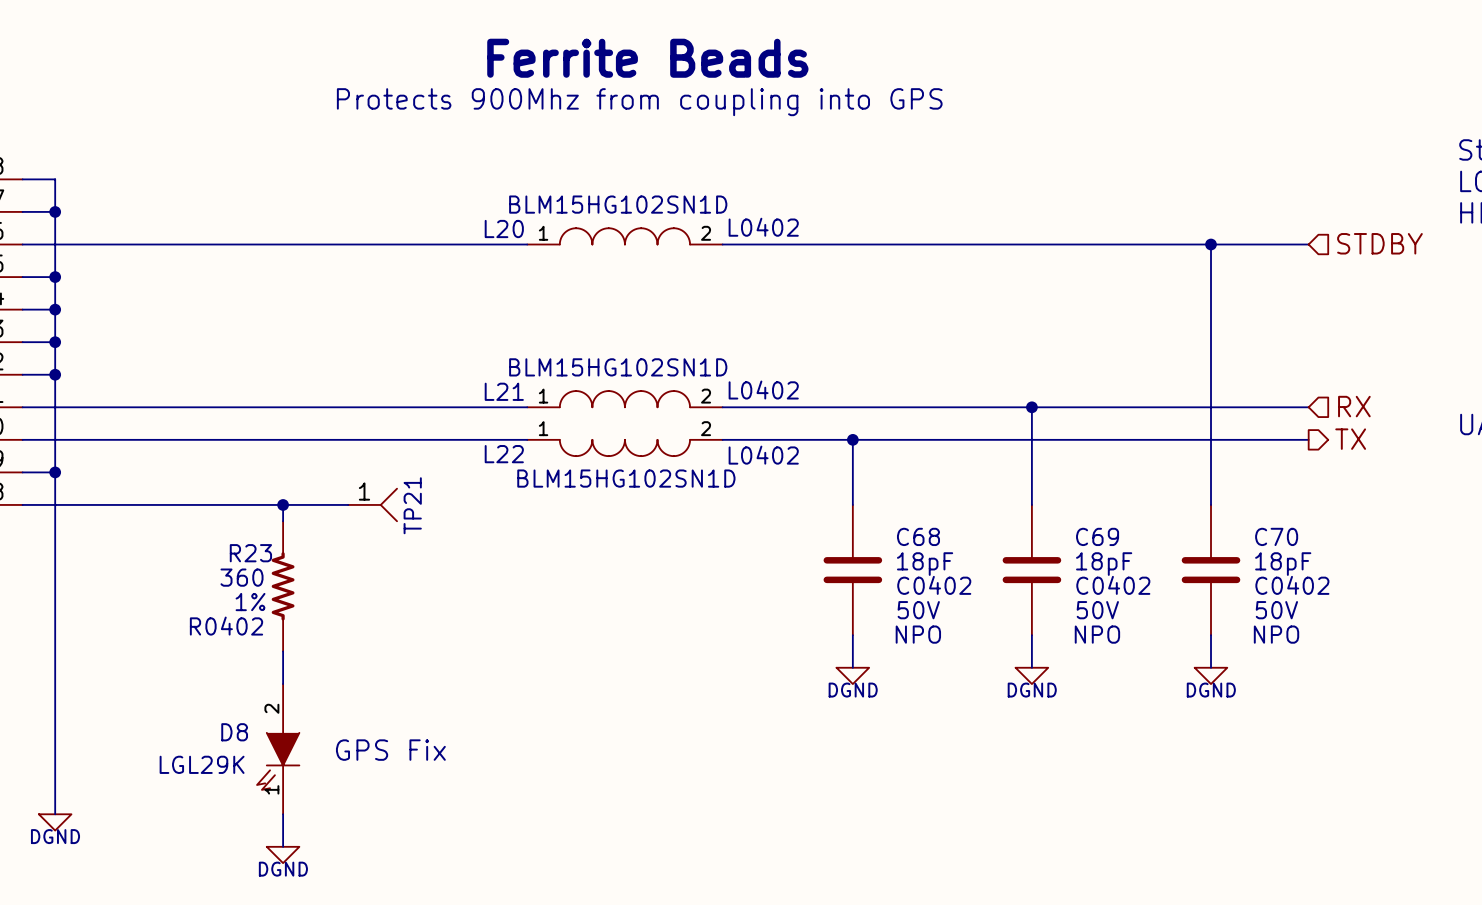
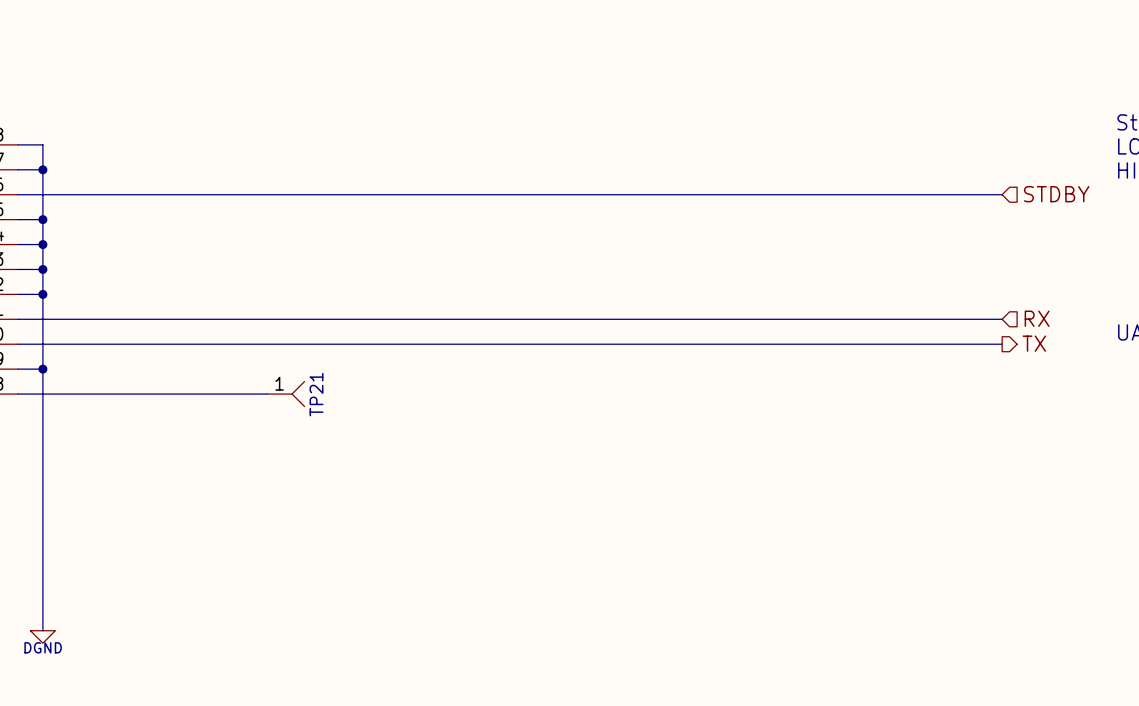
text: Ferrite Beads (647, 58) -> none
text: Protects 900Mhz from coupling into GPS (639, 102) -> none
L20: BLM15HG102SN1D (624, 236) -> none
wire: none -> (404, 194) (553, 194)
wire: (1211, 244) (1211, 504) -> none
junction: (1211, 244) -> none
L21: BLM15HG102SN1D (624, 399) -> none
wire: none -> (404, 319) (553, 319)
wire: (1031, 407) (1031, 504) -> none
junction: (1031, 407) -> none
wire: none -> (404, 344) (553, 344)
wire: (852, 439) (852, 504) -> none
junction: (852, 439) -> none
L22: BLM15HG102SN1D (624, 447) -> none
wire: (283, 504) (283, 521) -> none
junction: (283, 504) -> none
C68: 18pF (852, 570) -> none
C69: 18pF (1031, 570) -> none
C70: 18pF (1211, 570) -> none
R23: 360 (283, 586) -> none
wire: (852, 635) (852, 667) -> none
wire: (1031, 635) (1031, 667) -> none
wire: (1211, 635) (1211, 667) -> none
wire: (283, 651) (283, 684) -> none
power symbol: DGND (852, 675) -> none
power symbol: DGND (1031, 675) -> none
power symbol: DGND (1211, 675) -> none
D8: (278, 749) -> none
text: GPS Fix (390, 750) -> none
wire: (283, 814) (283, 846) -> none
power symbol: DGND (283, 854) -> none

